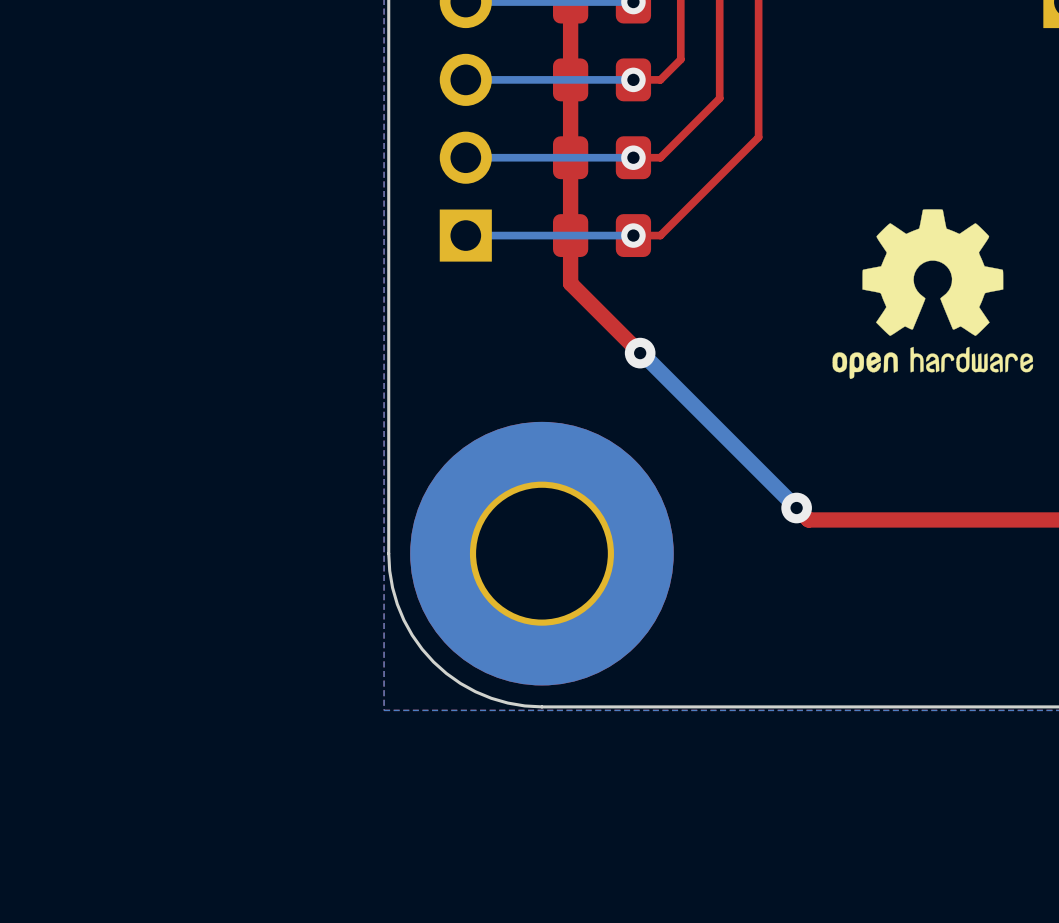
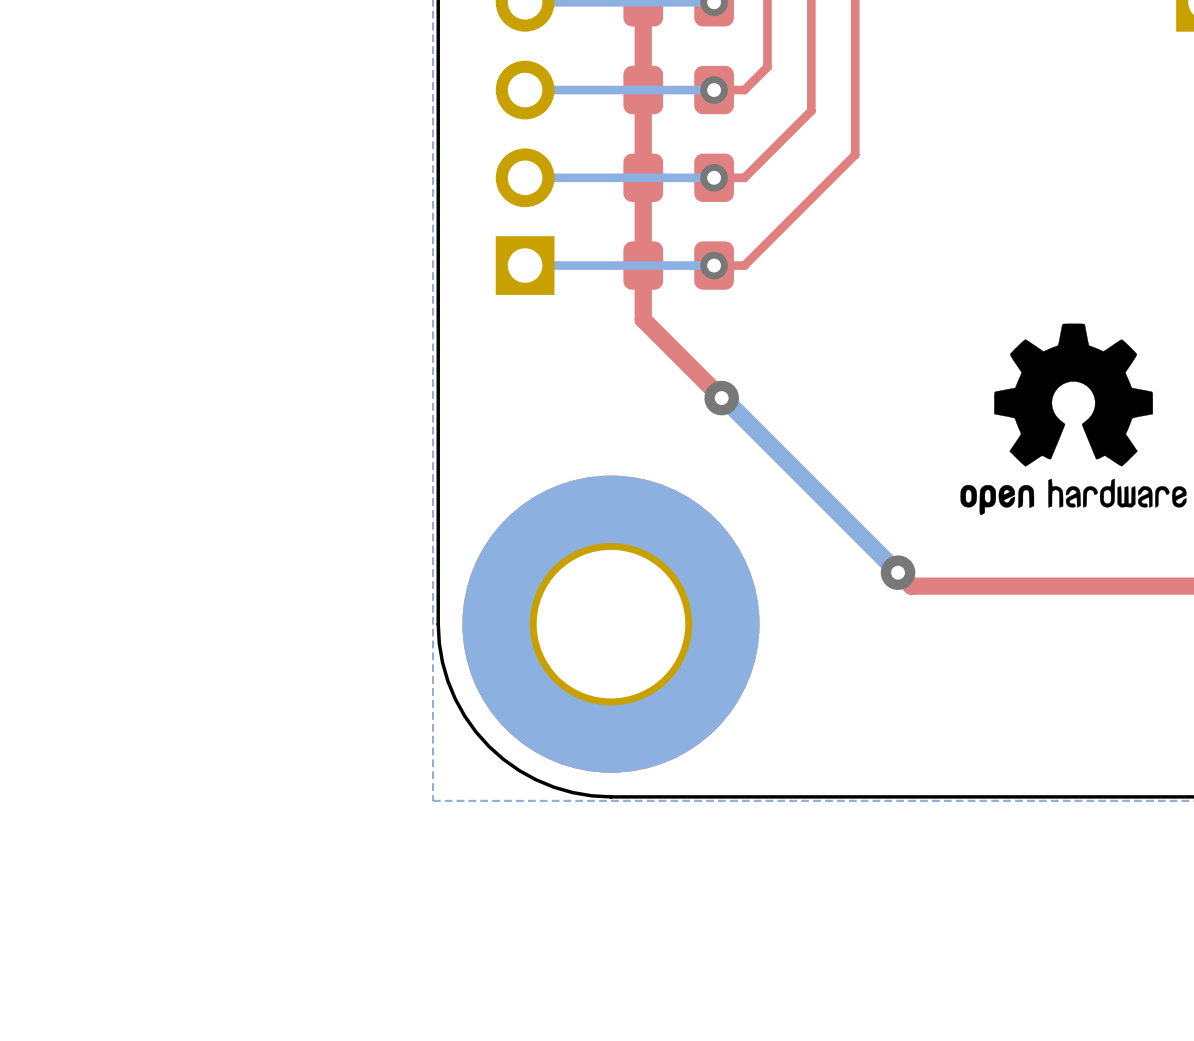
drawing position: (932, 294) -> (1073, 419)

